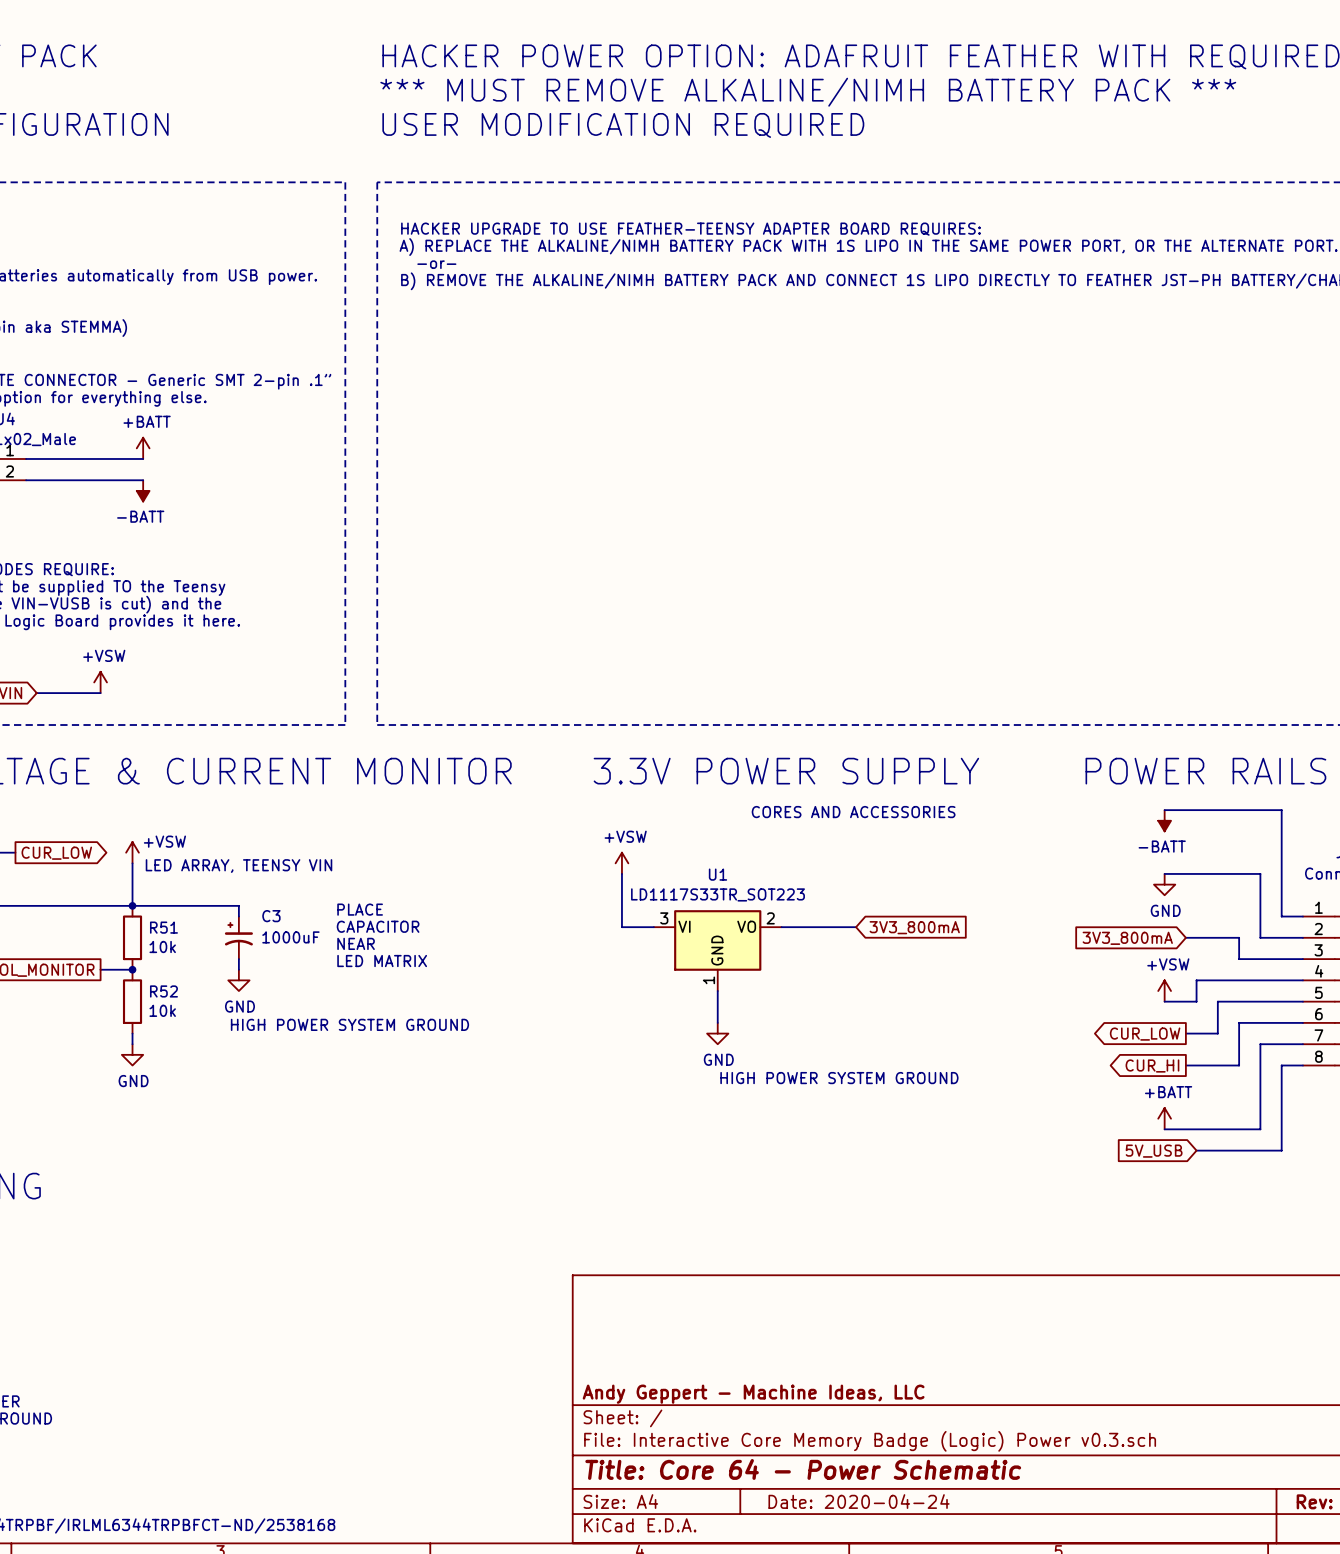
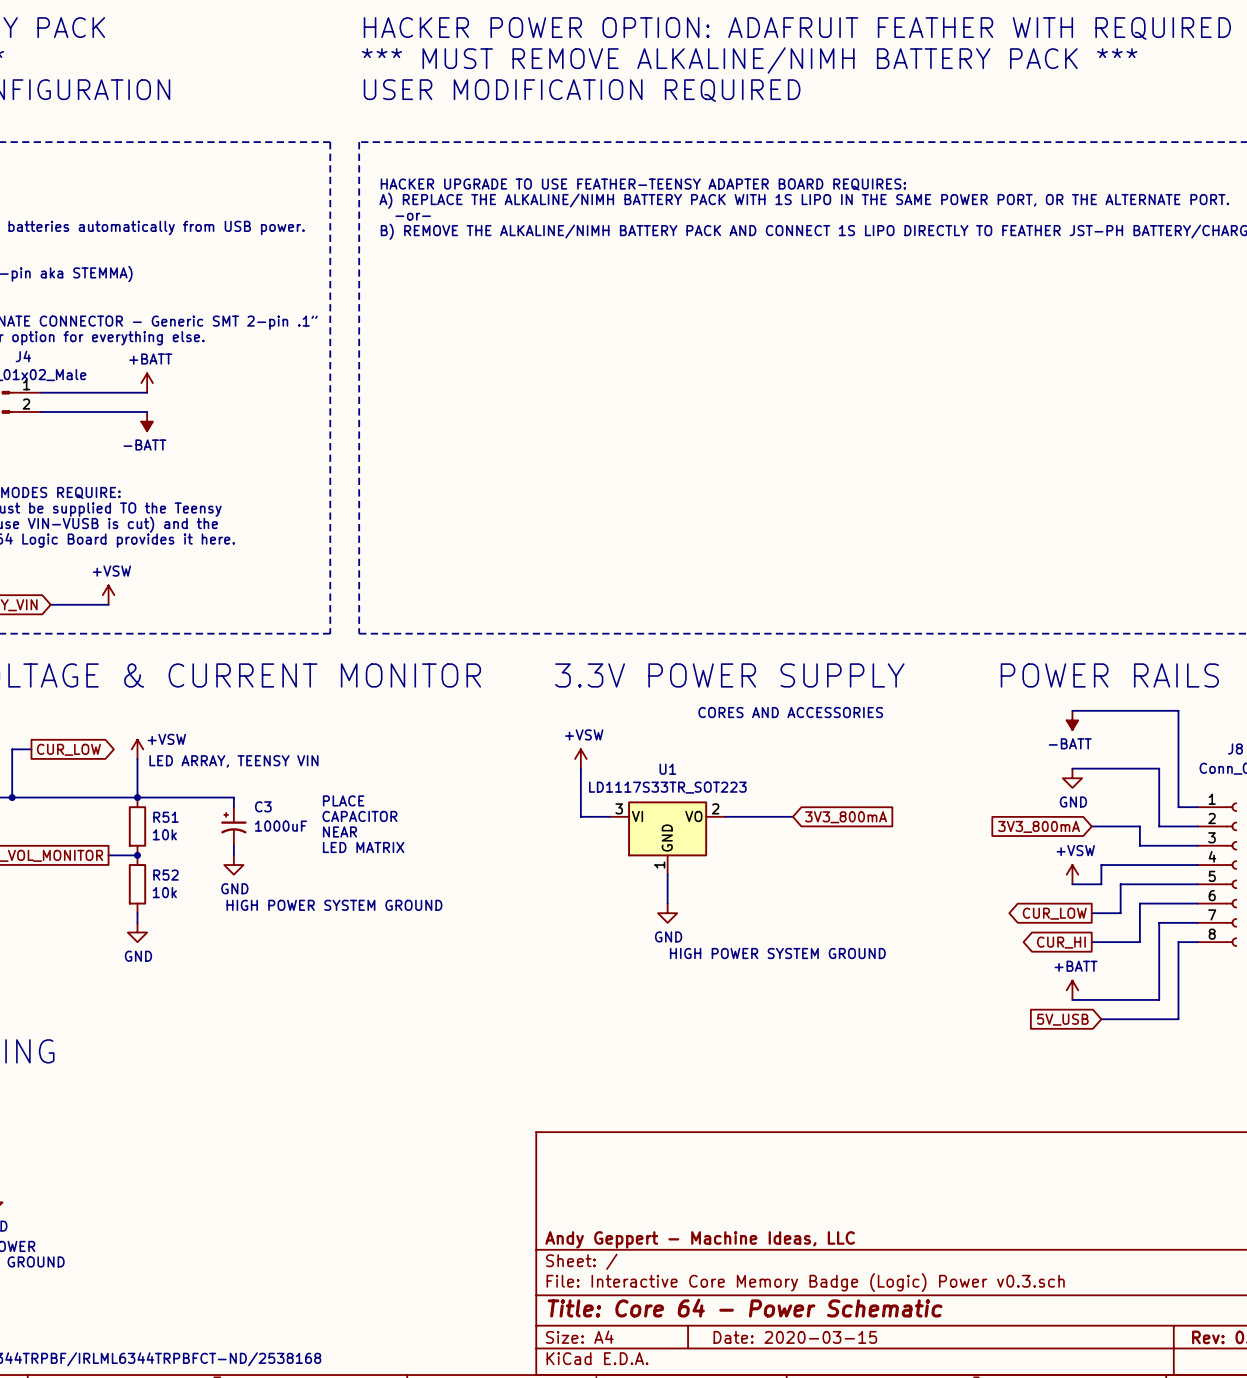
title block: Date: 2020-04-24 (859, 1501) -> Date: 2020-03-15 (795, 1337)

